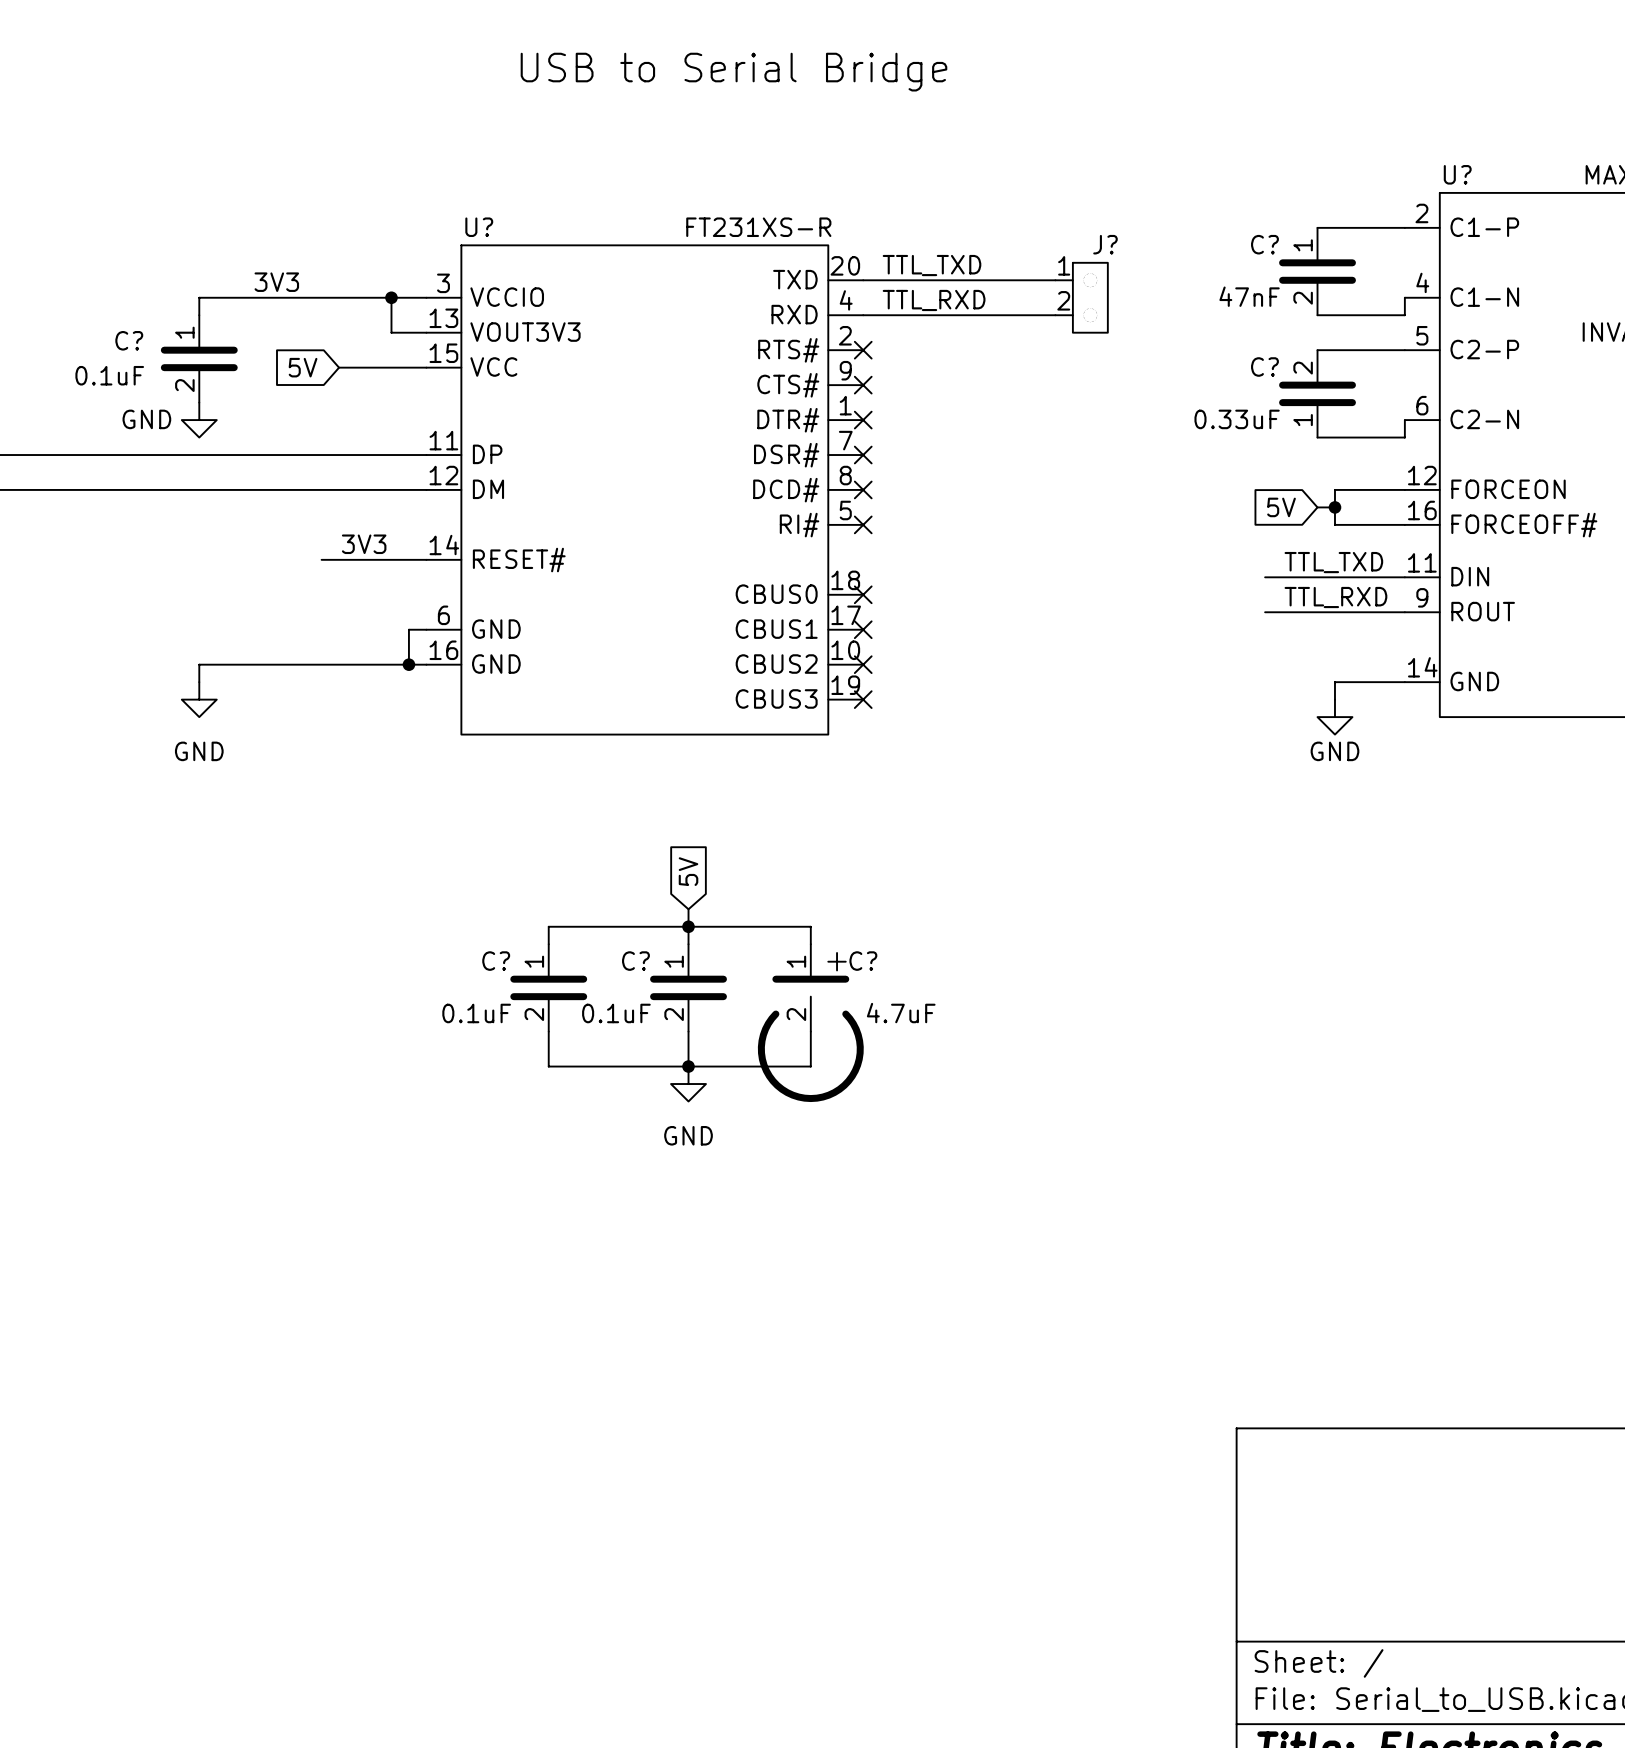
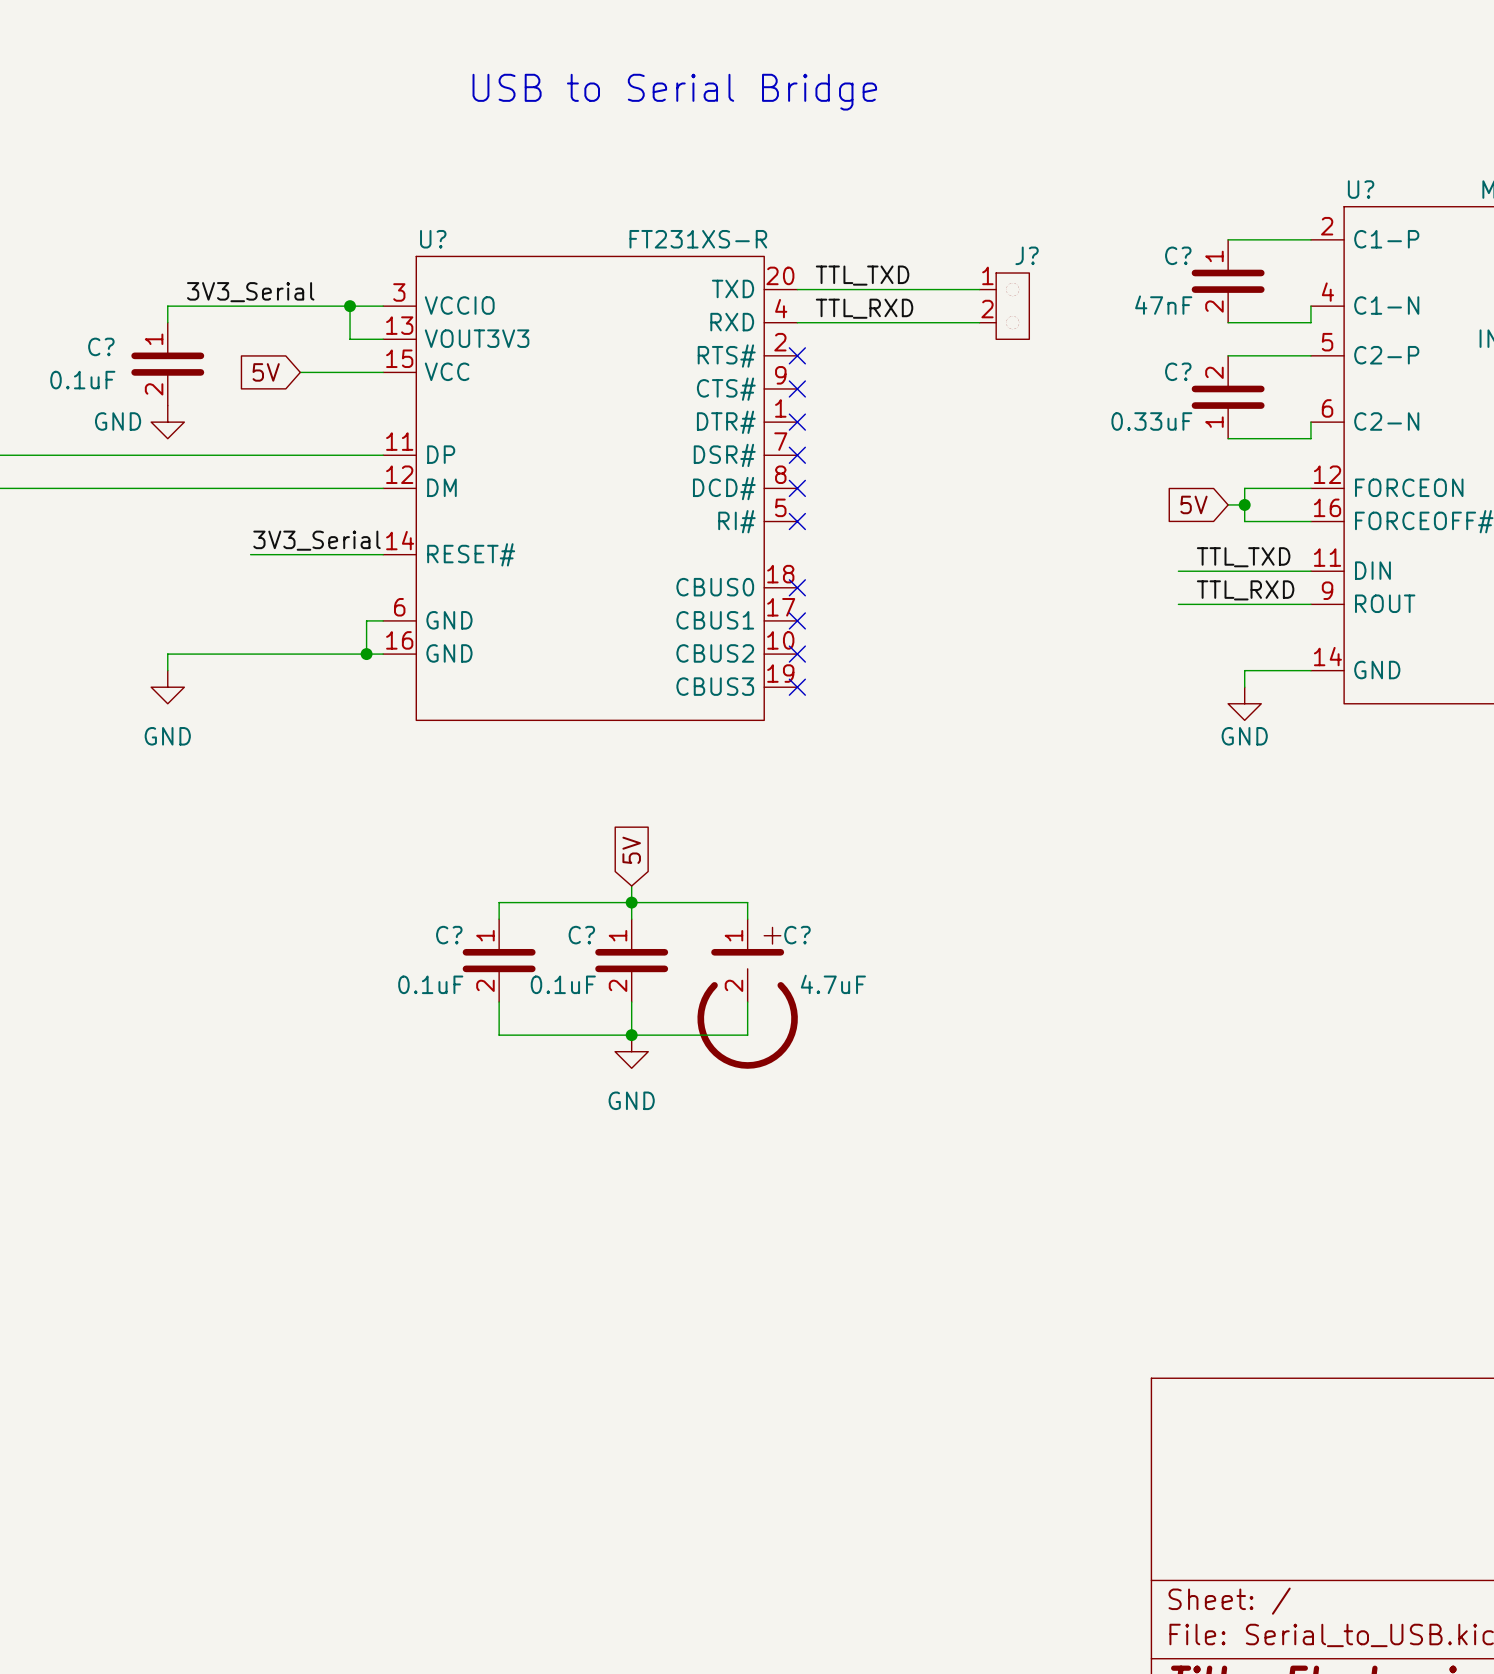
label: 3V3 (276, 282) -> none
label: none -> 3V3_Serial (250, 292)
label: 3V3 (364, 544) -> none
label: none -> 3V3_Serial (317, 540)
wire: none -> (250, 554) (283, 554)

